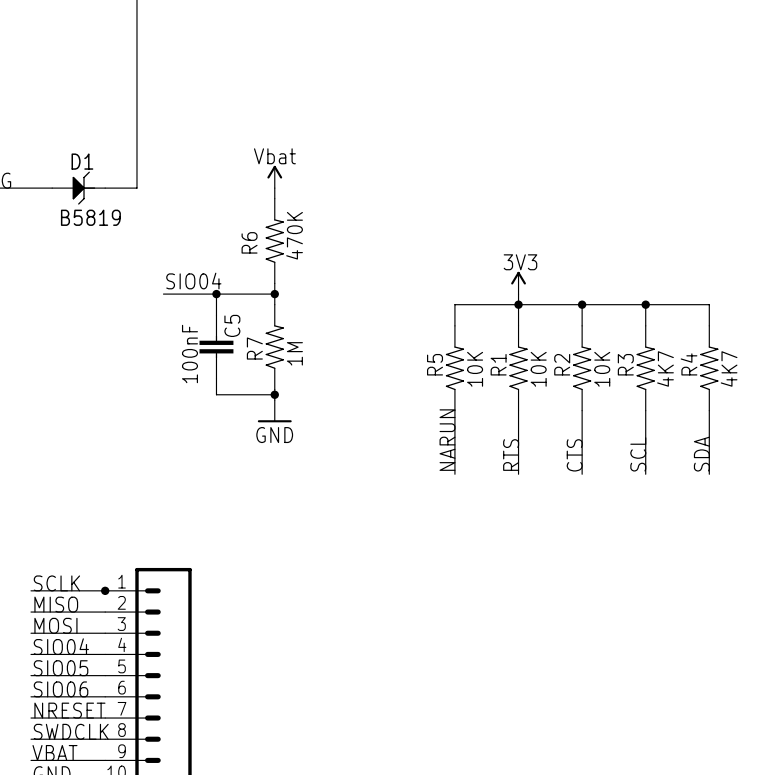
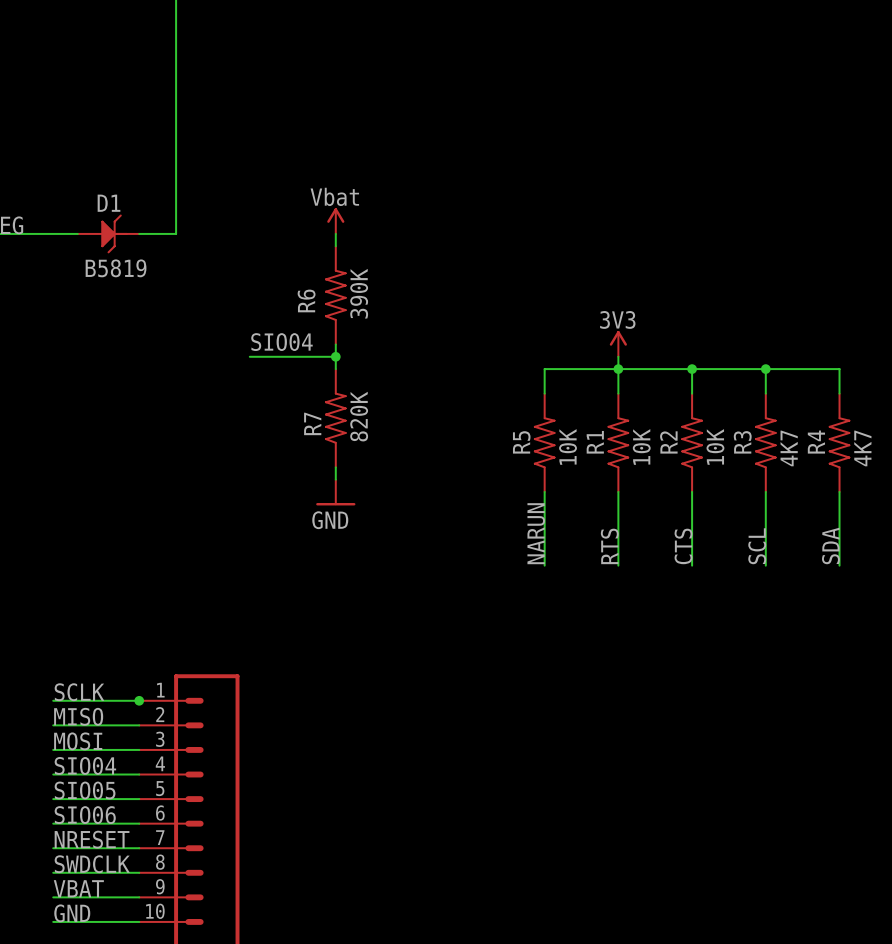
R6 value: 470K (294, 235) -> 390K (359, 293)
label position: SIO04 (193, 281) -> SIO04 (281, 342)
wire: (163, 294) (200, 294) -> none
wire: (216, 294) (216, 315) -> none
junction: (216, 294) -> none
C5: 100nF (216, 347) -> none
R7 value: 1M (294, 353) -> 820K (359, 416)
wire: (216, 378) (216, 394) (274, 394) -> none
junction: (274, 394) -> none

